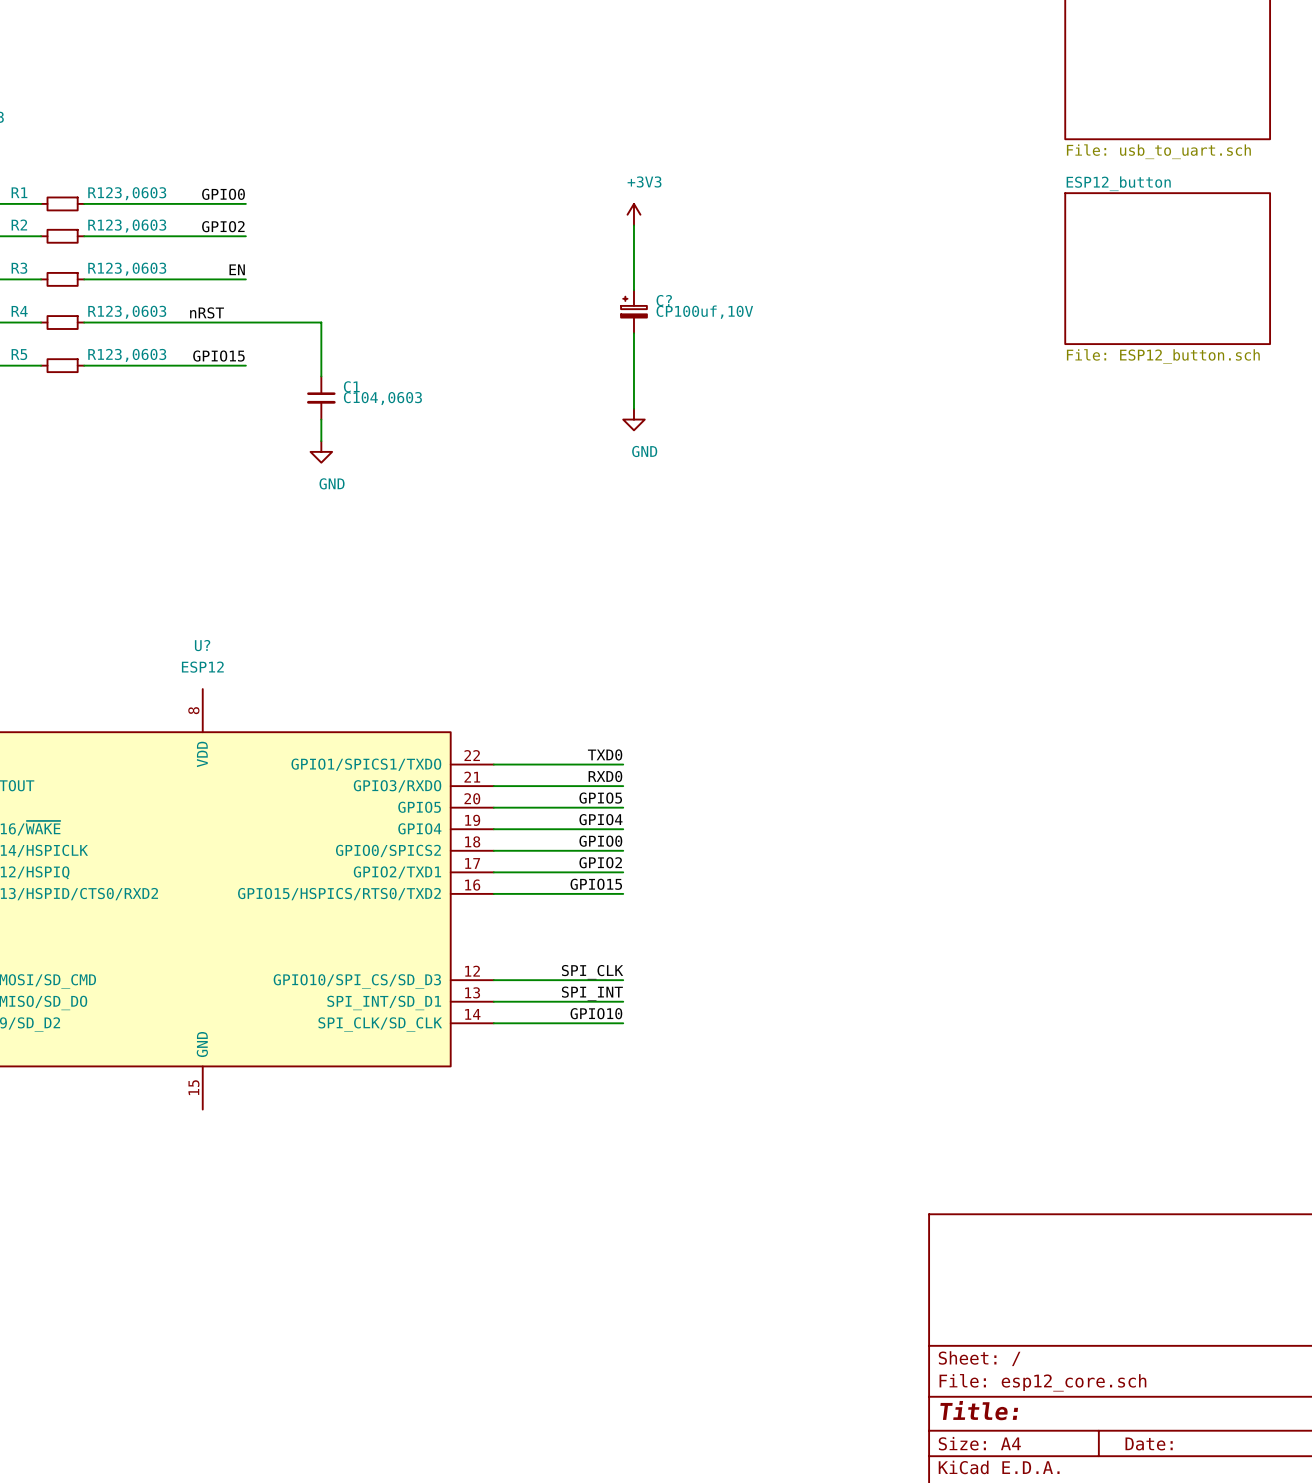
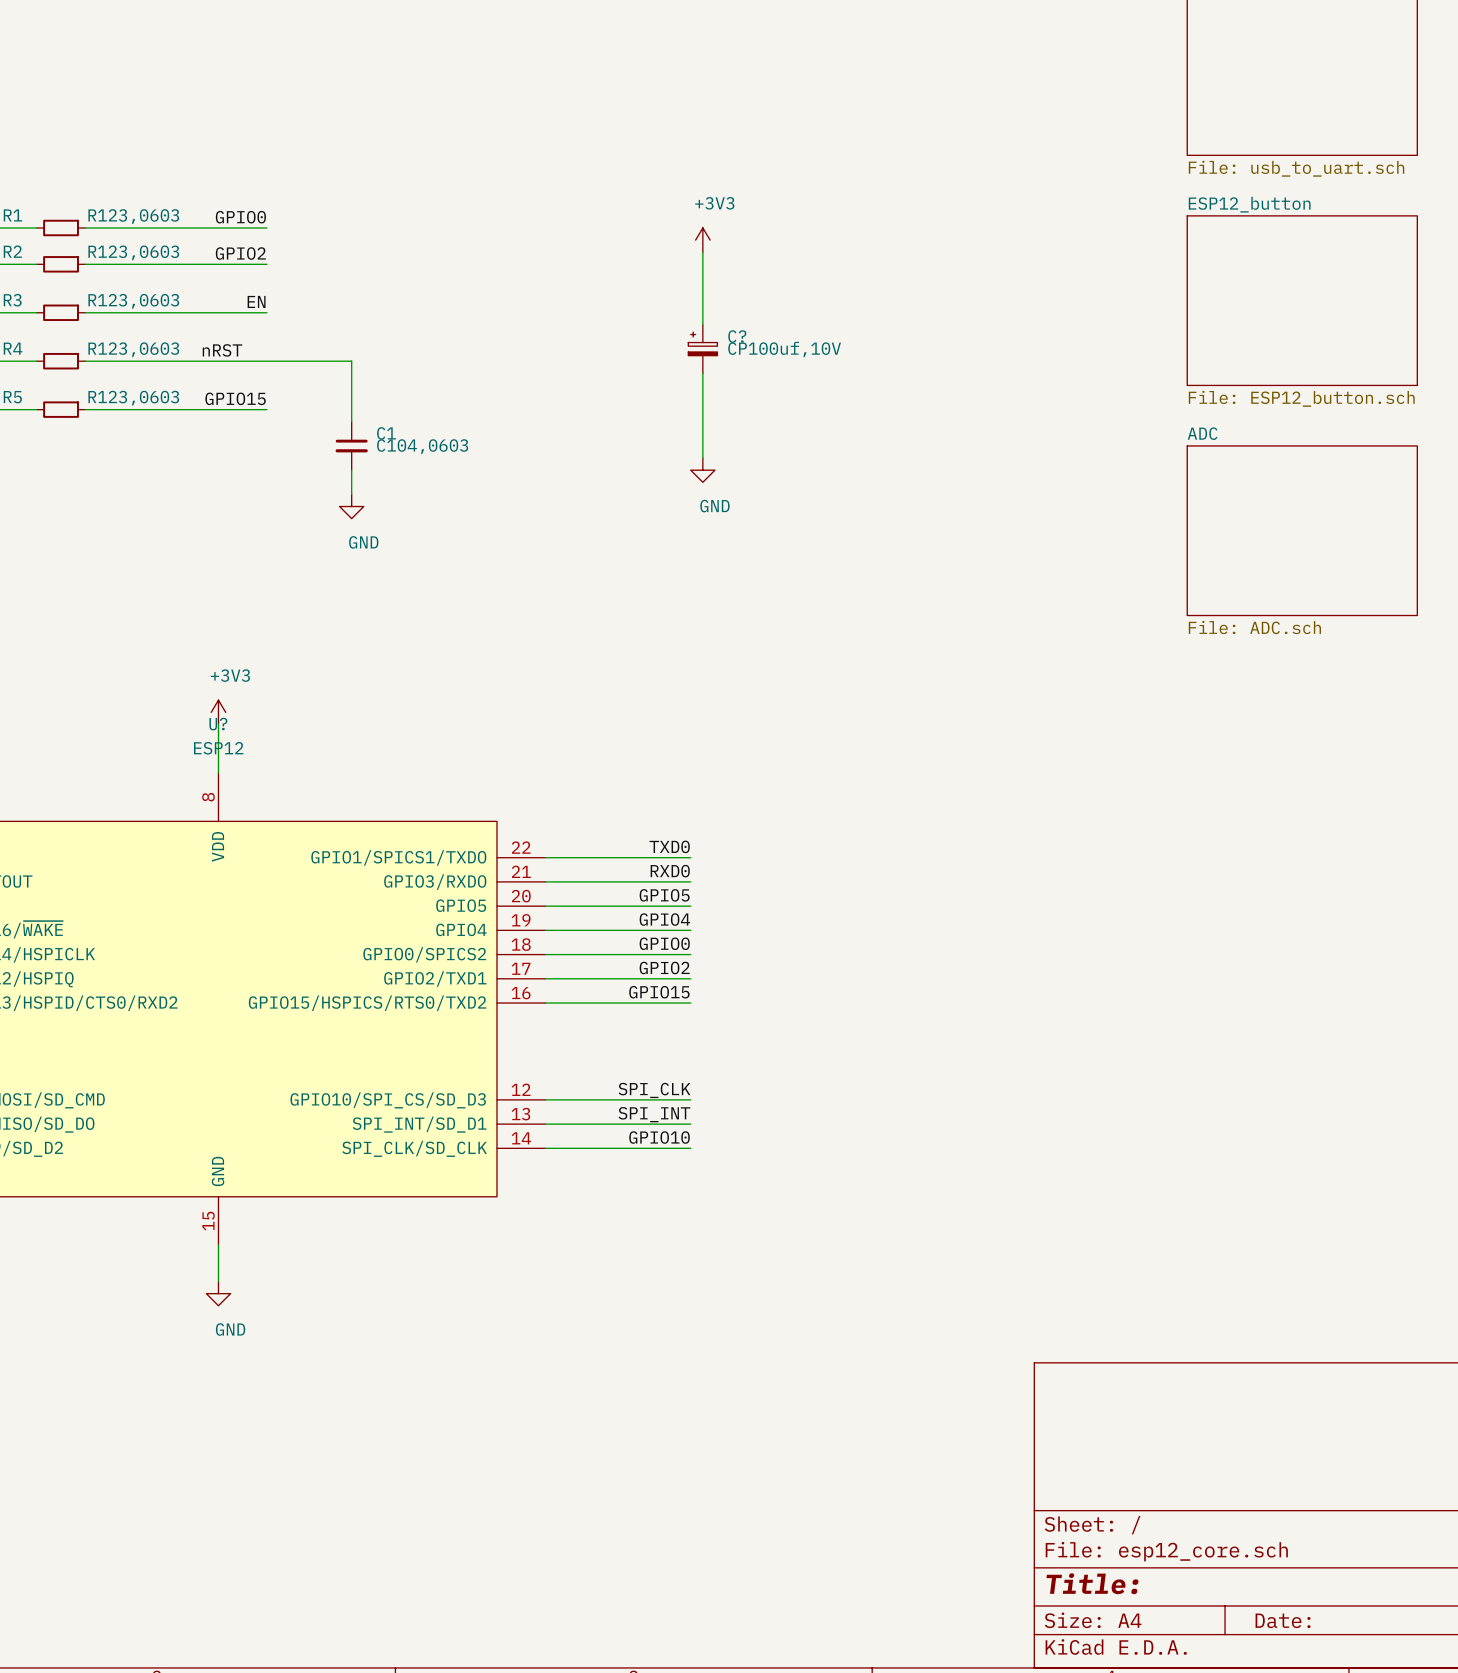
sheet ADC: none -> File: ADC.sch (1302, 530)
power symbol: none -> +3V3 (218, 712)
wire: none -> (218, 724) (218, 772)
wire: none -> (218, 1245) (218, 1281)
power symbol: none -> GND (218, 1293)

